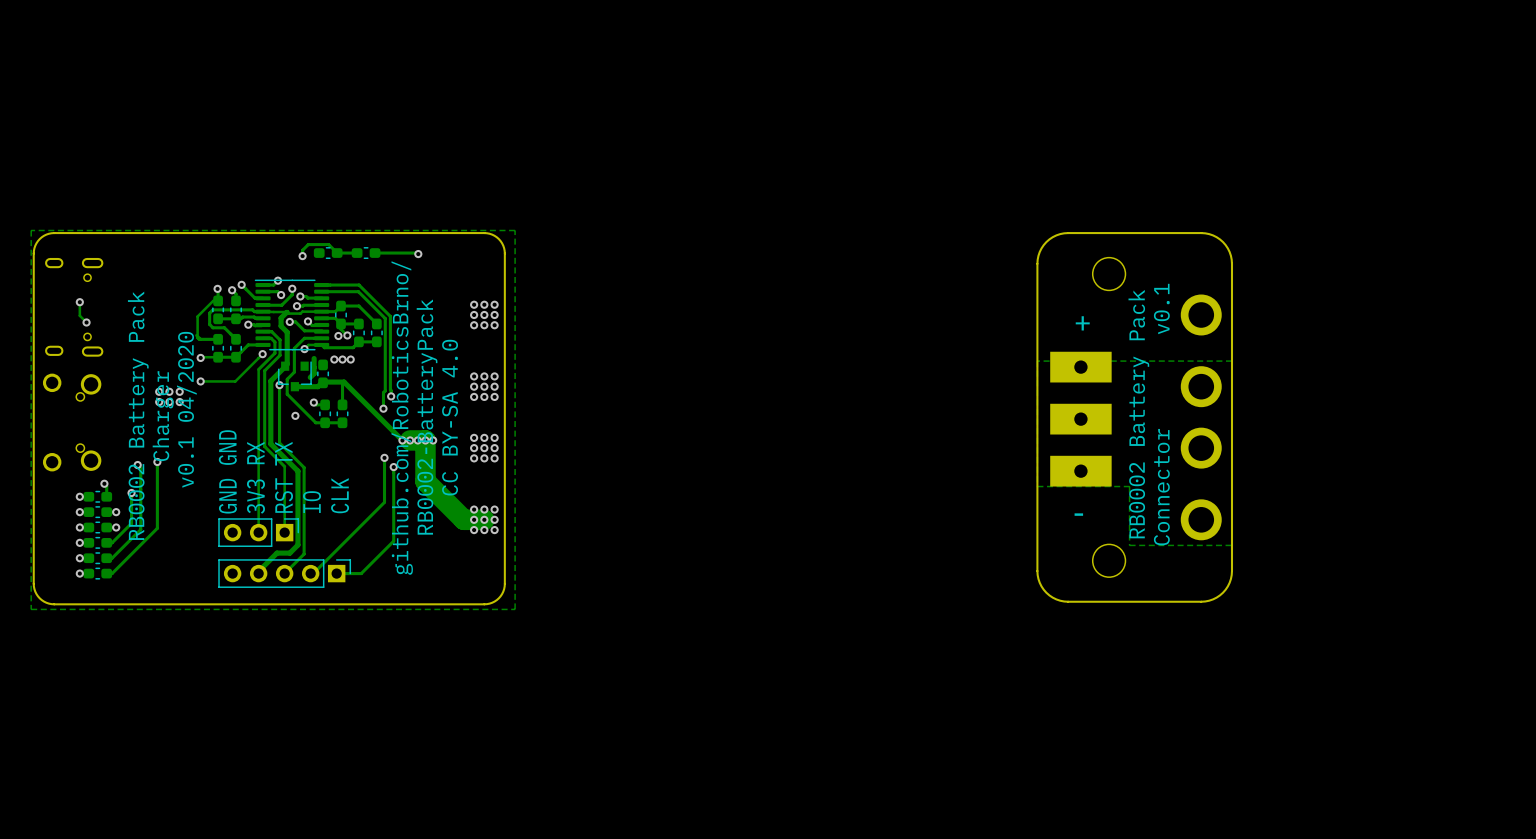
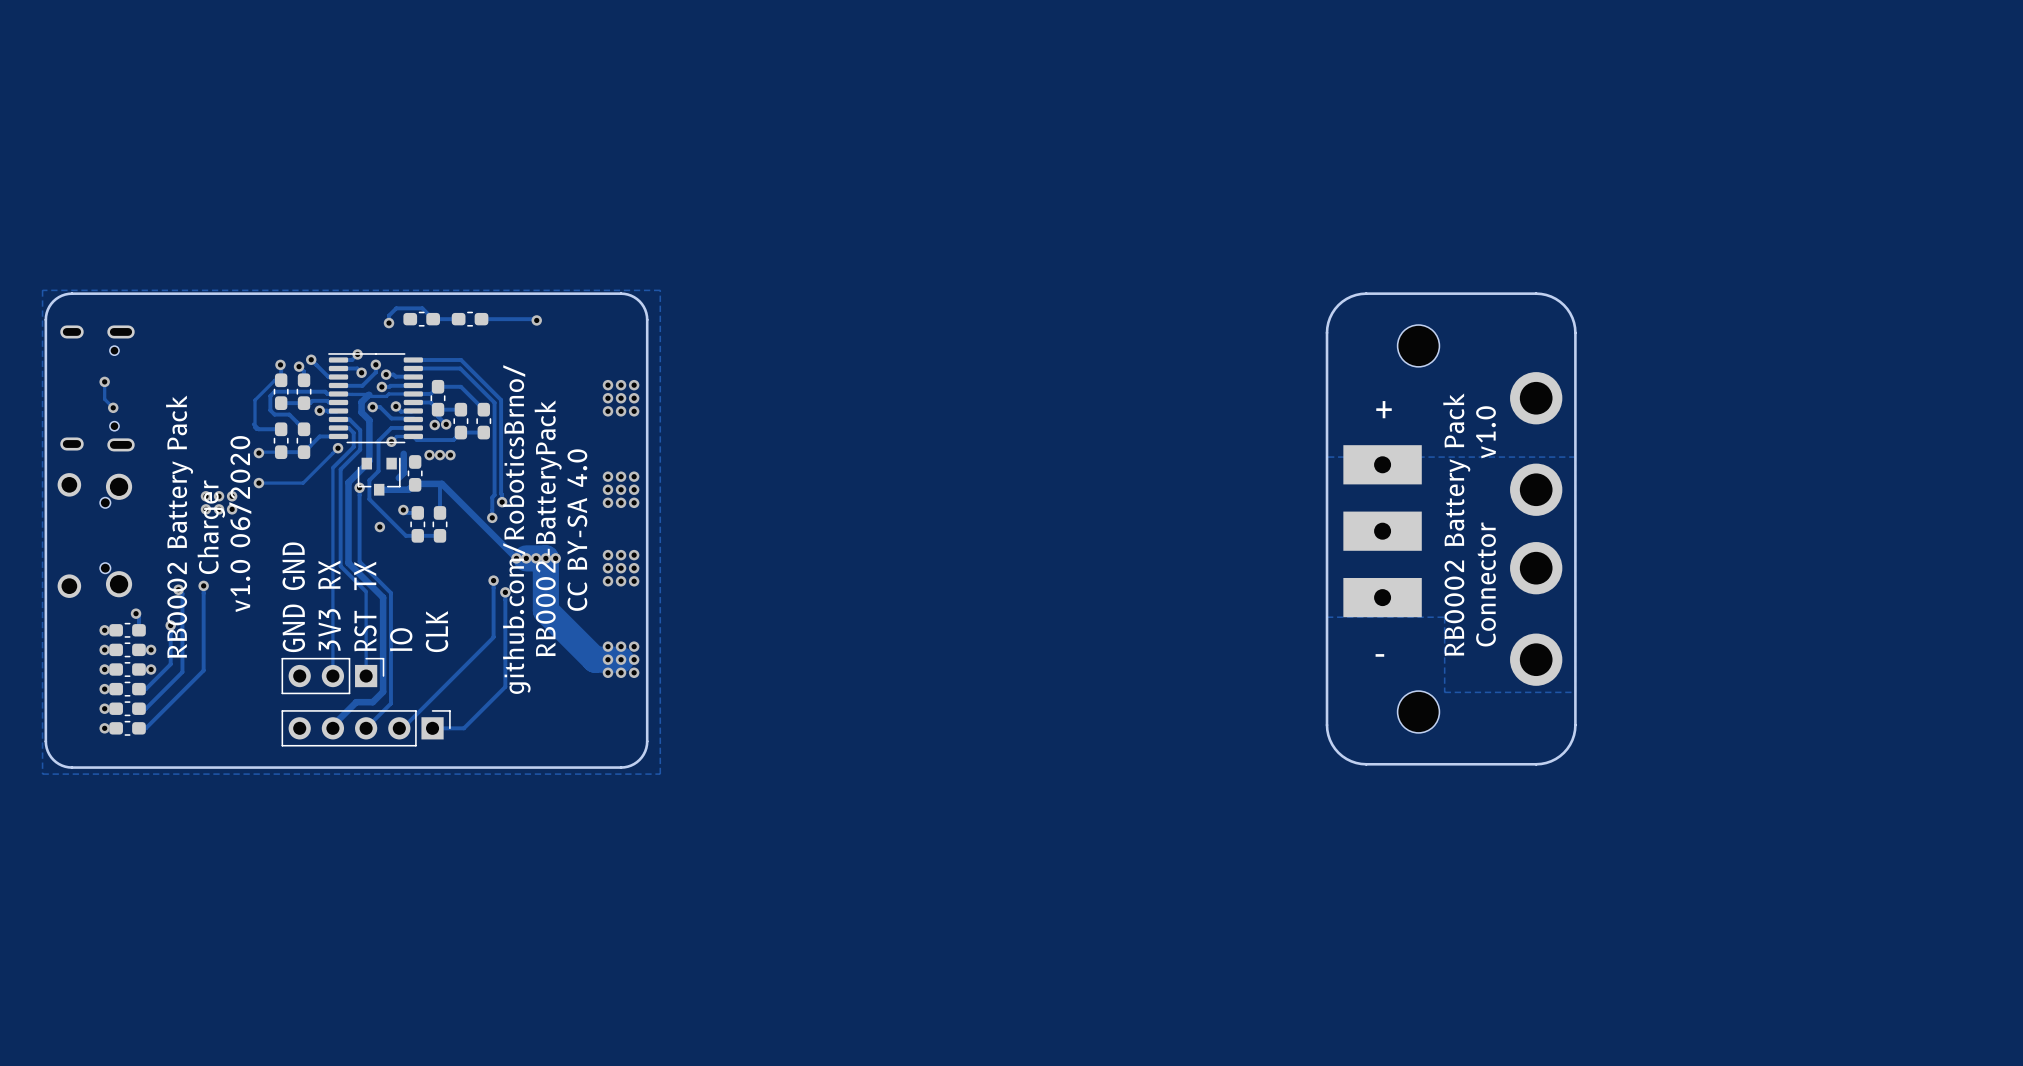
text: v0.1 04/2020 (186, 409) -> v1.0 06/2020 (240, 524)
text: Connector v0.1 (1161, 414) -> Connector v1.0 (1486, 526)

